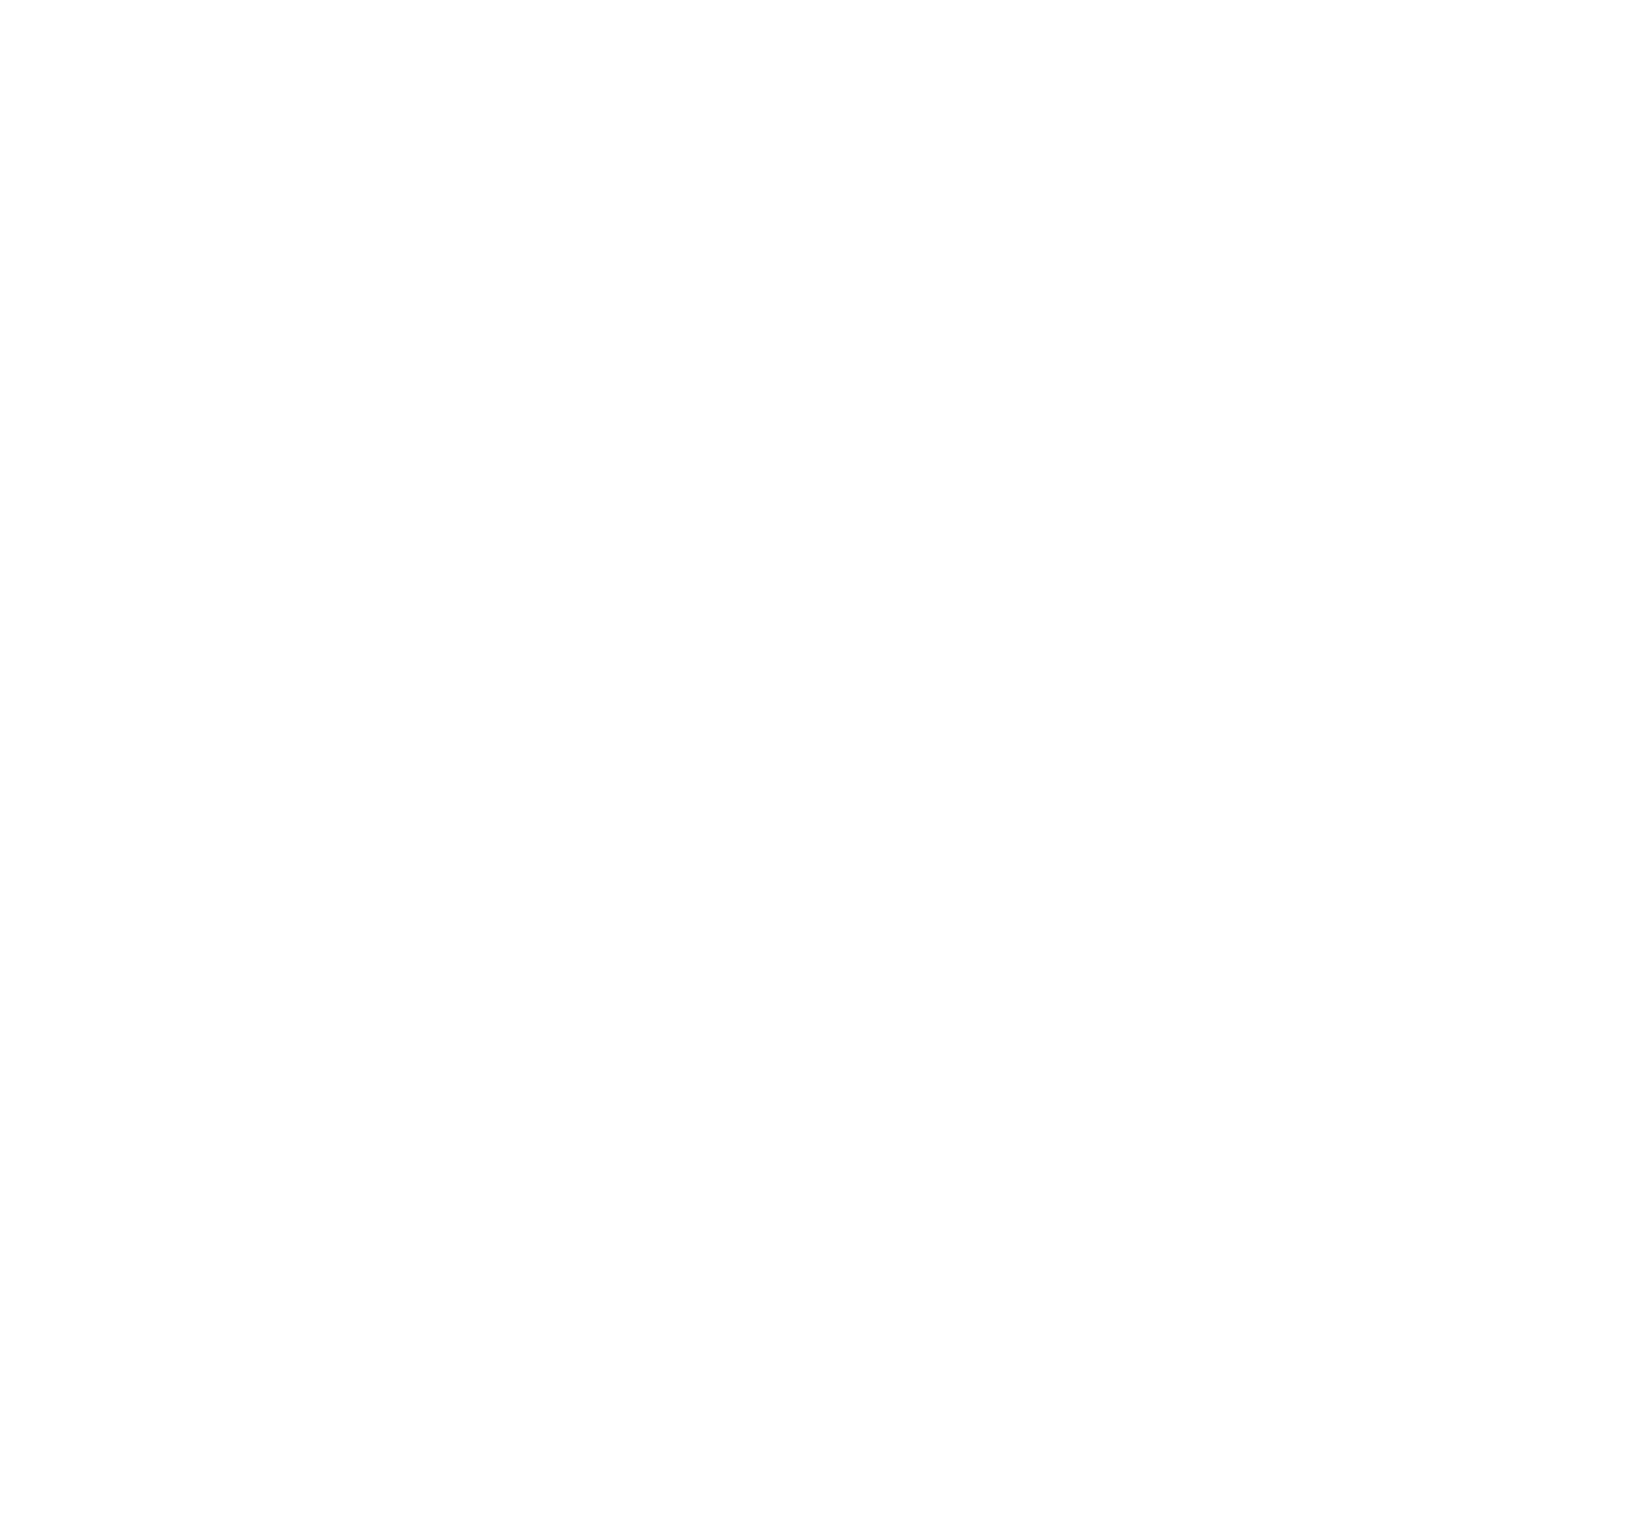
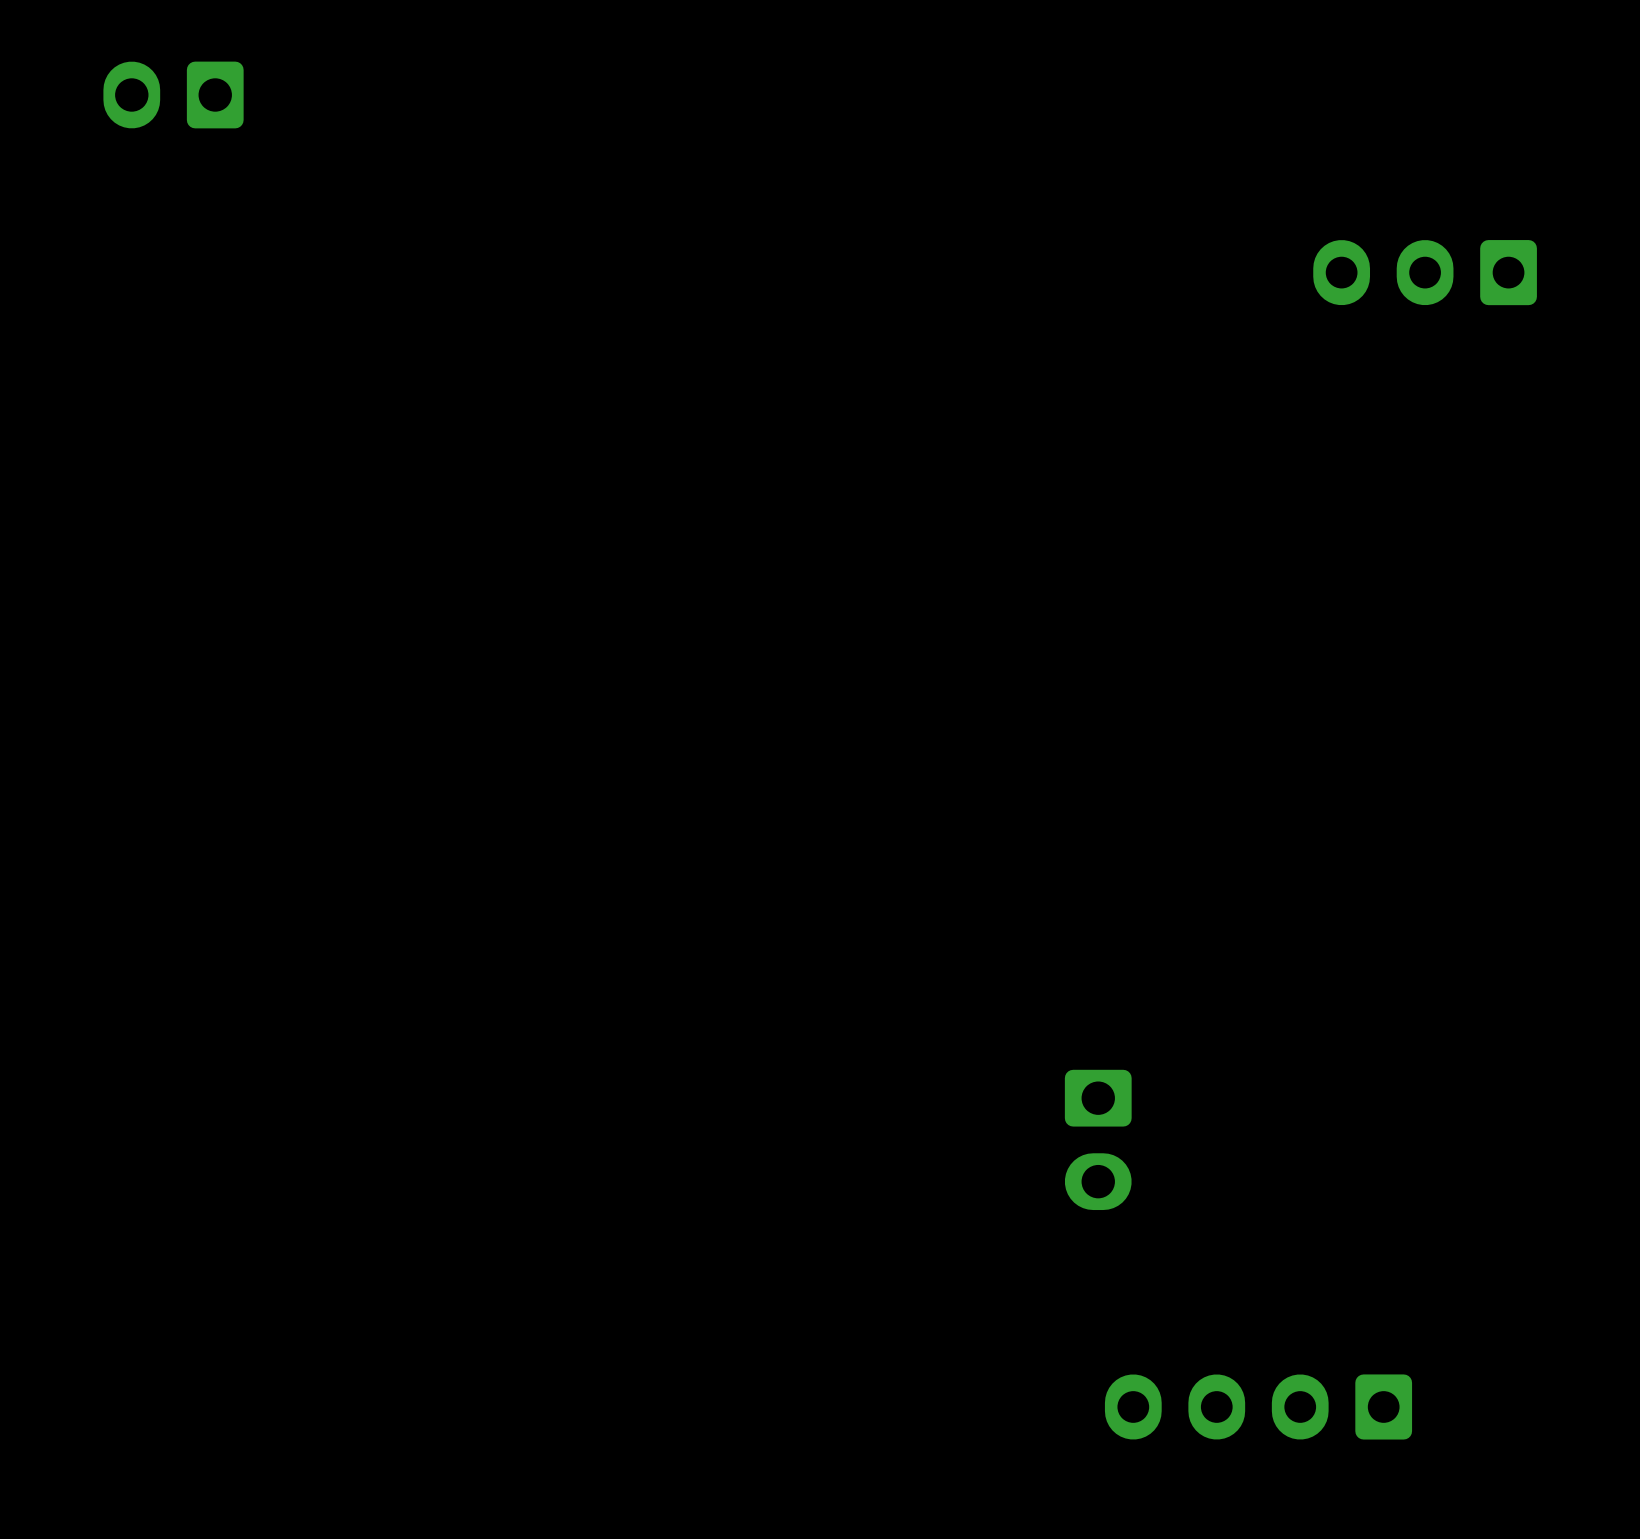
part: none -> (173, 94)
part: none -> (1425, 272)
part: none -> (1098, 1139)
part: none -> (1258, 1406)

